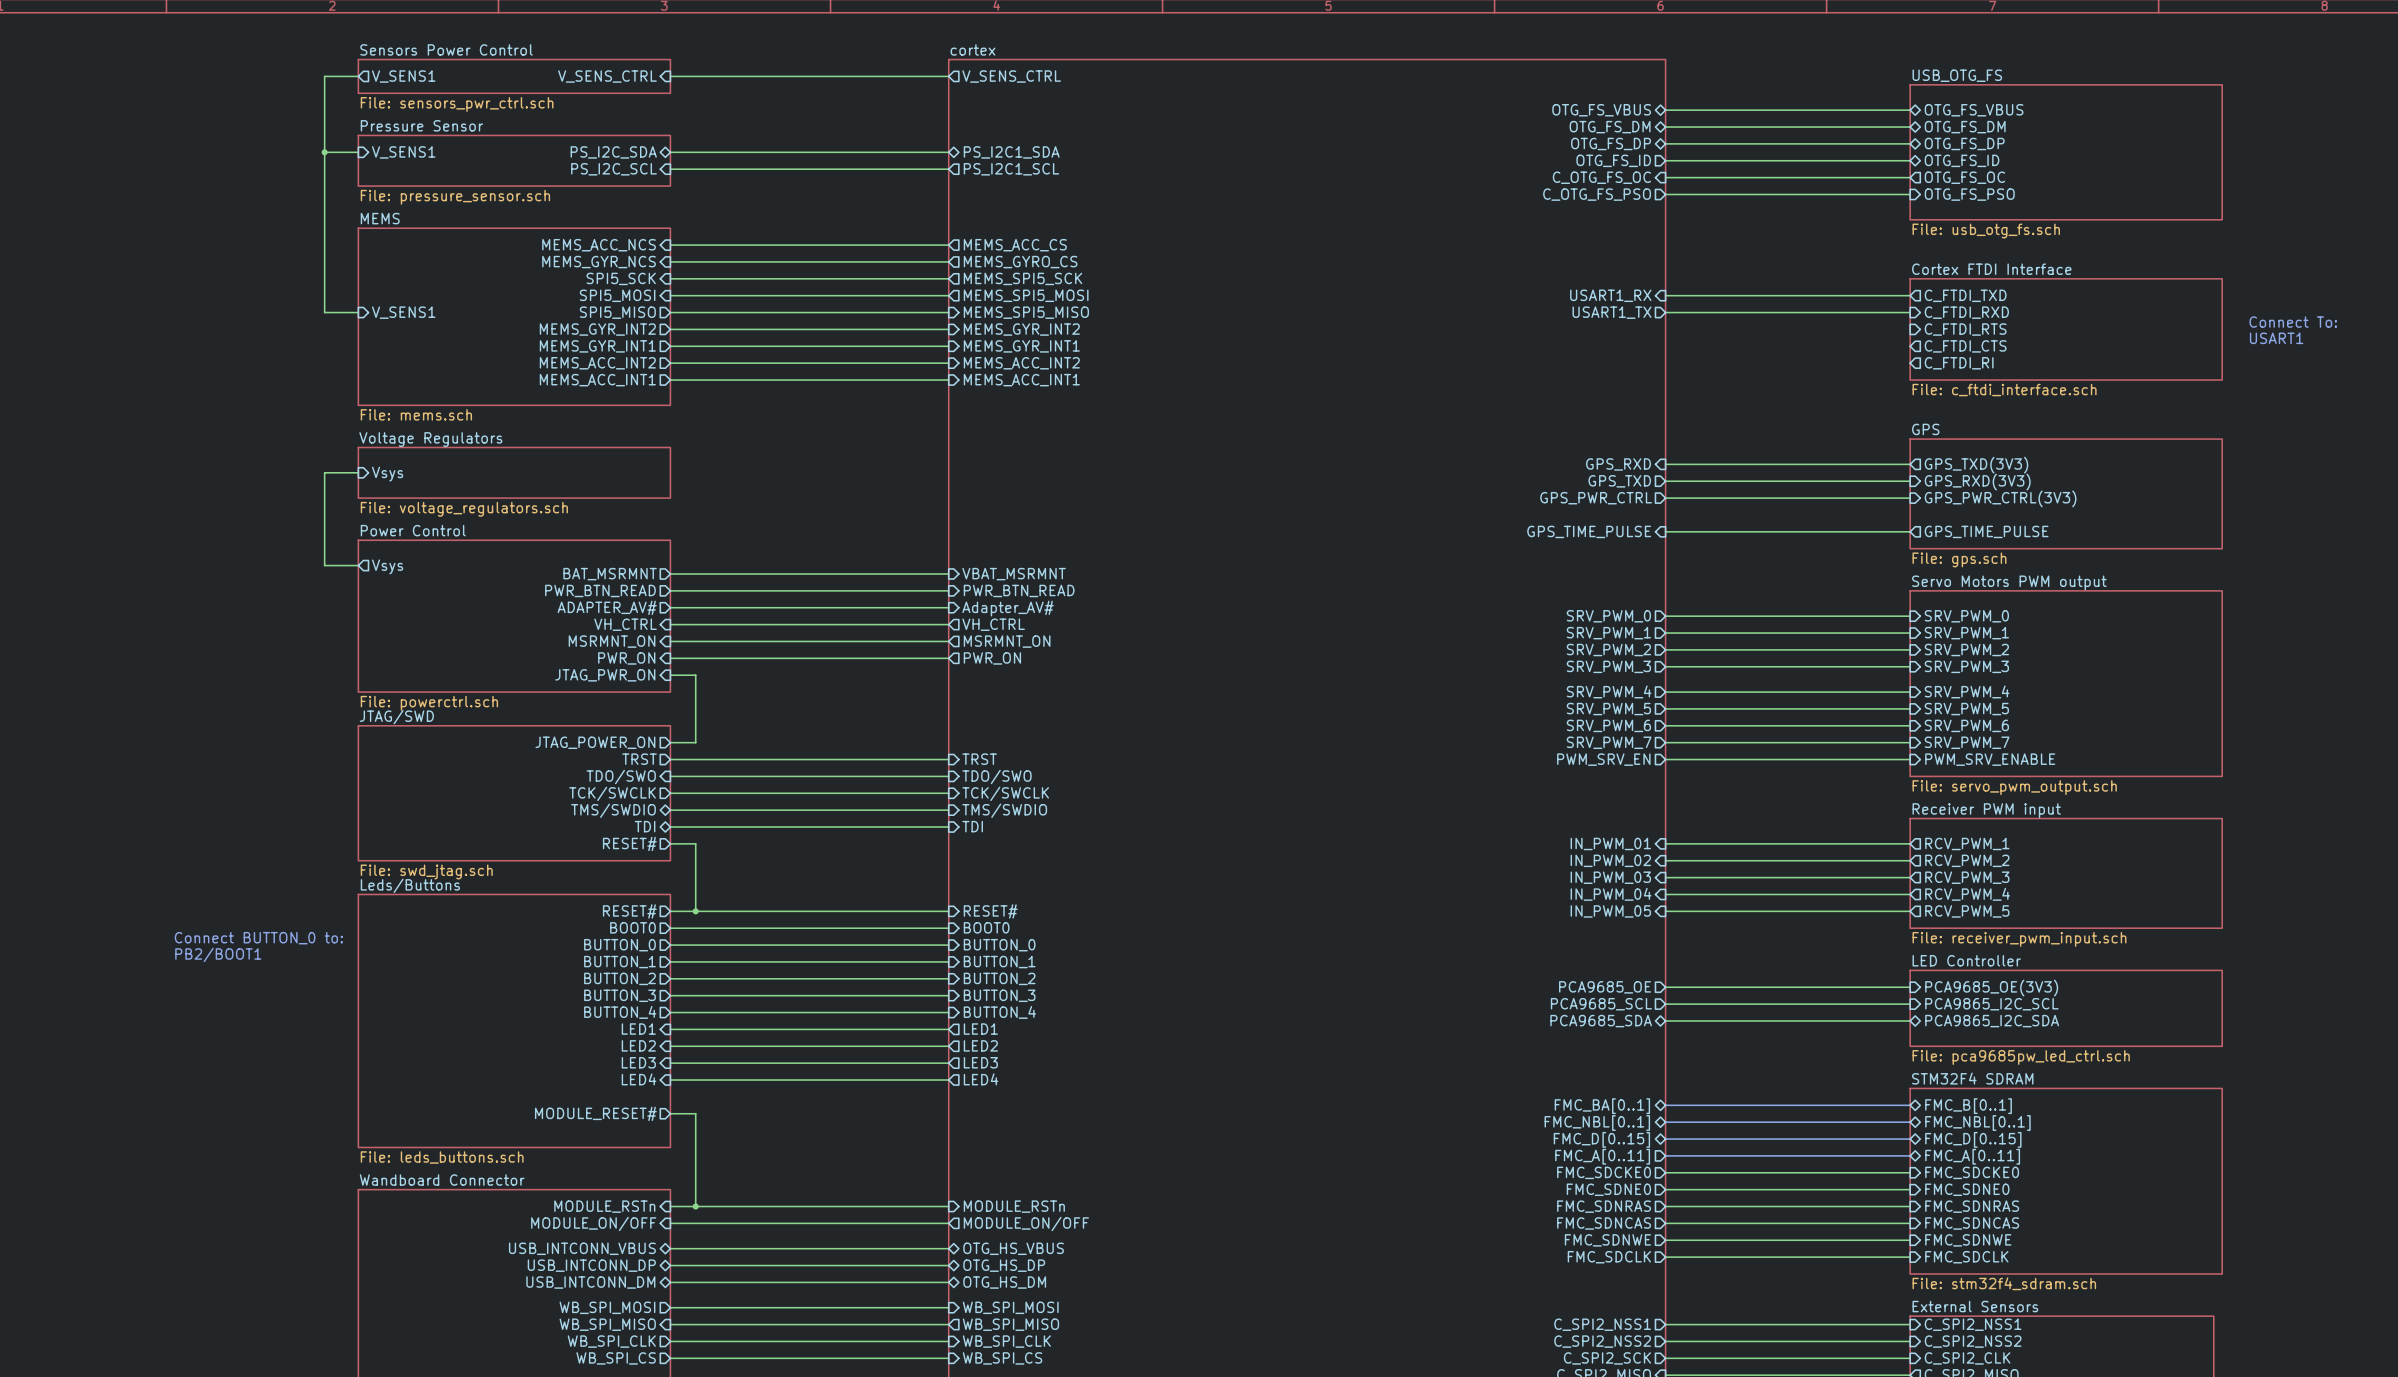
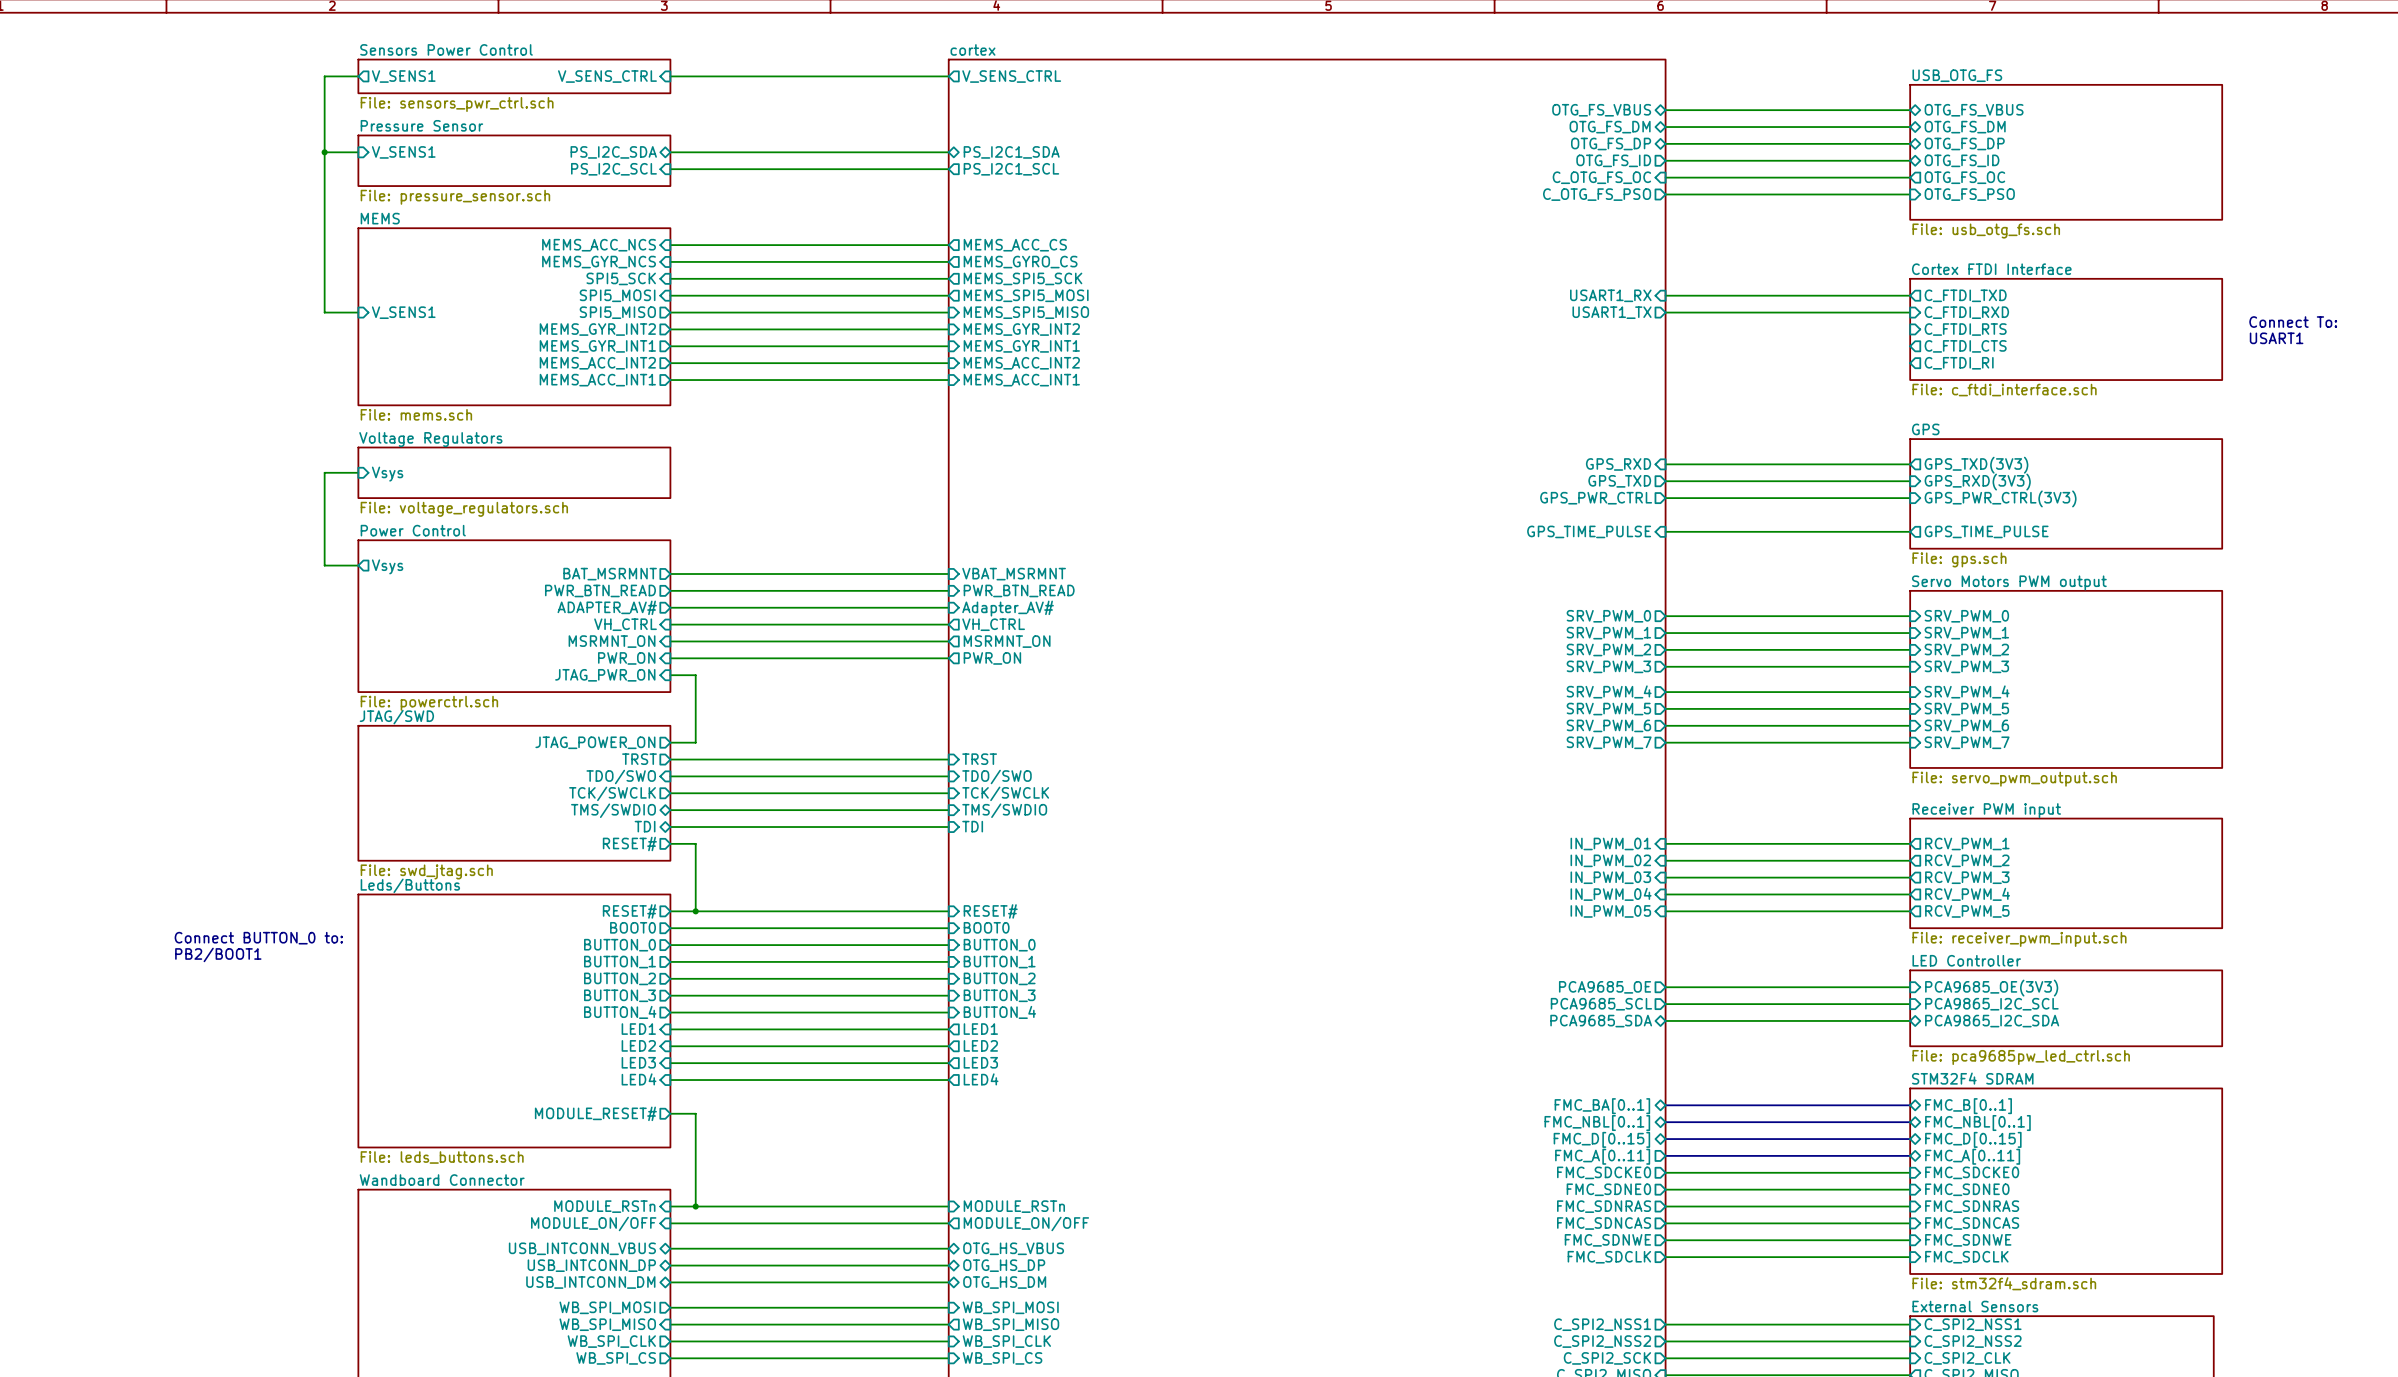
sheet Servo Motors PWM output shape: [1910, 590, 2223, 777] -> [1910, 590, 2223, 768]
sheet pin: PWM_SRV_EN (1603, 759) -> none
wire: (1665, 759) (1910, 759) -> none
sheet pin: PWM_SRV_ENABLE (1990, 759) -> none

